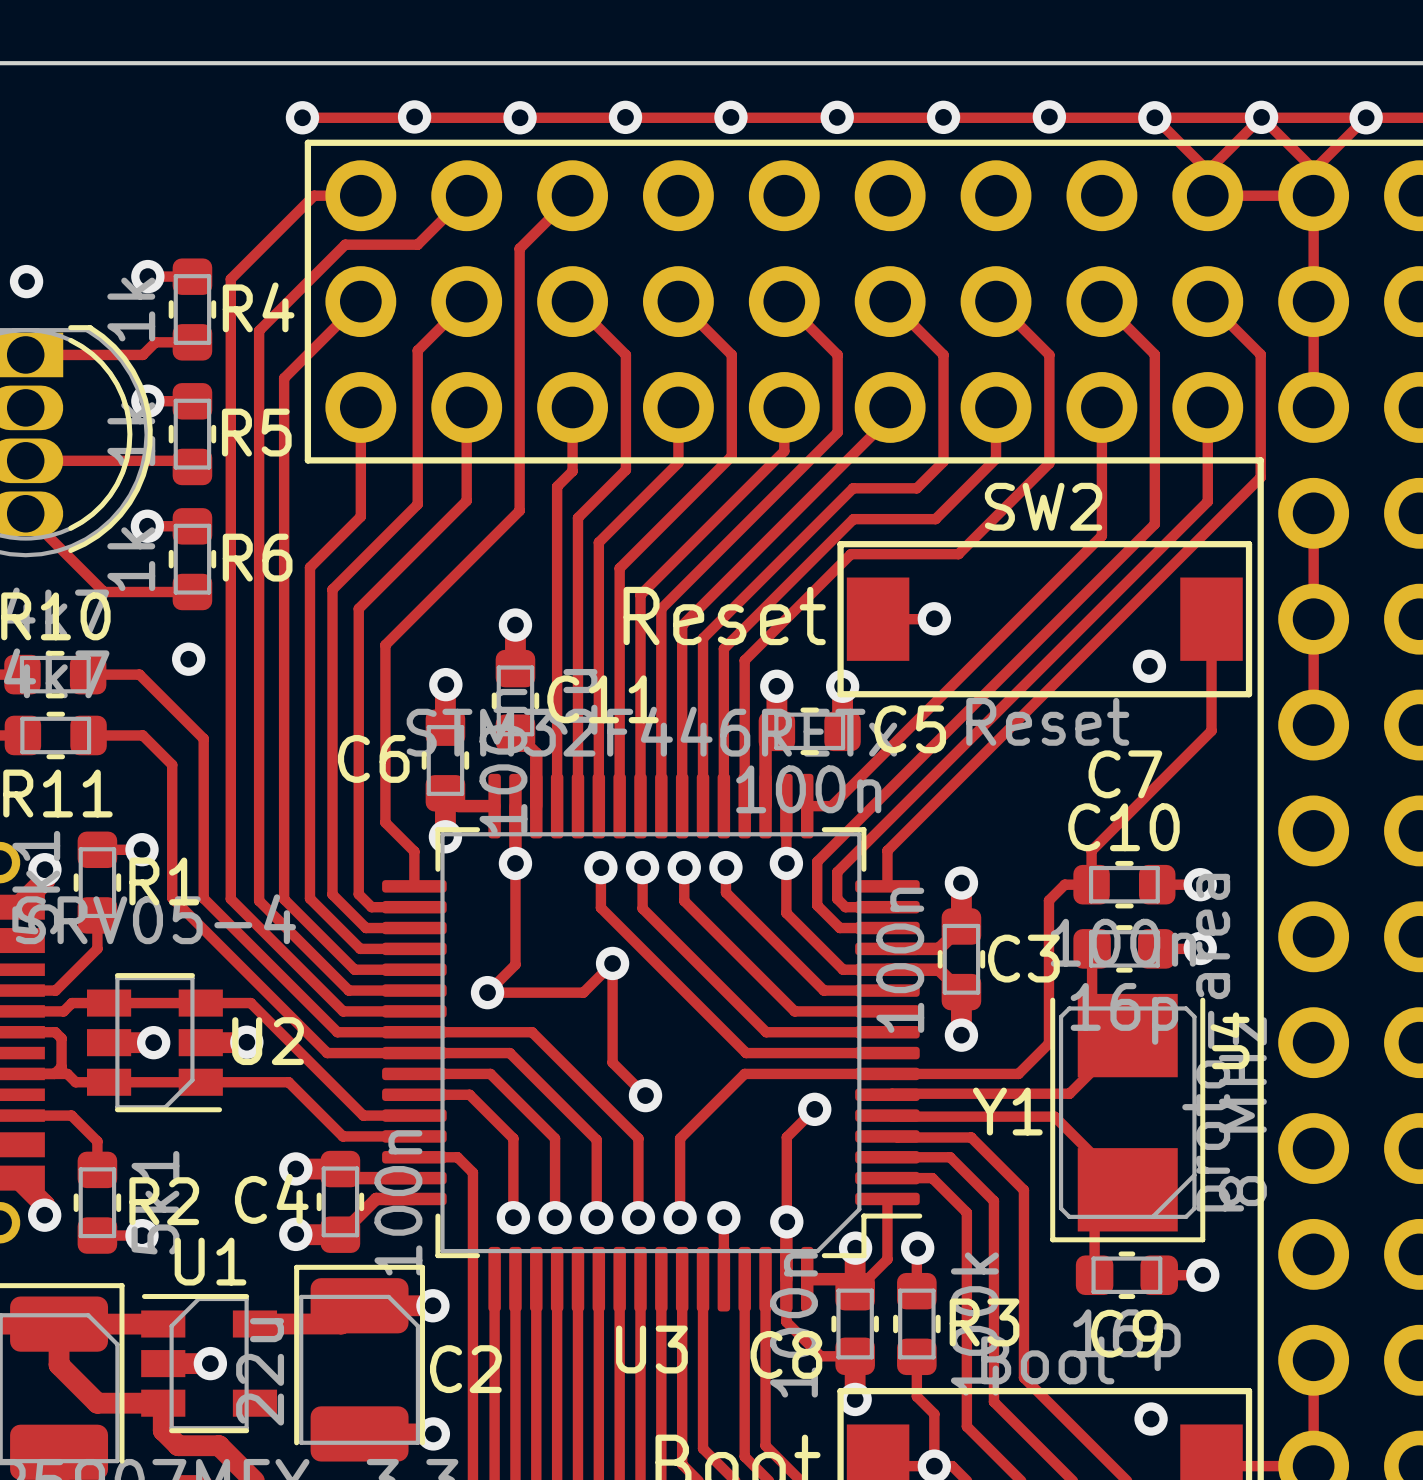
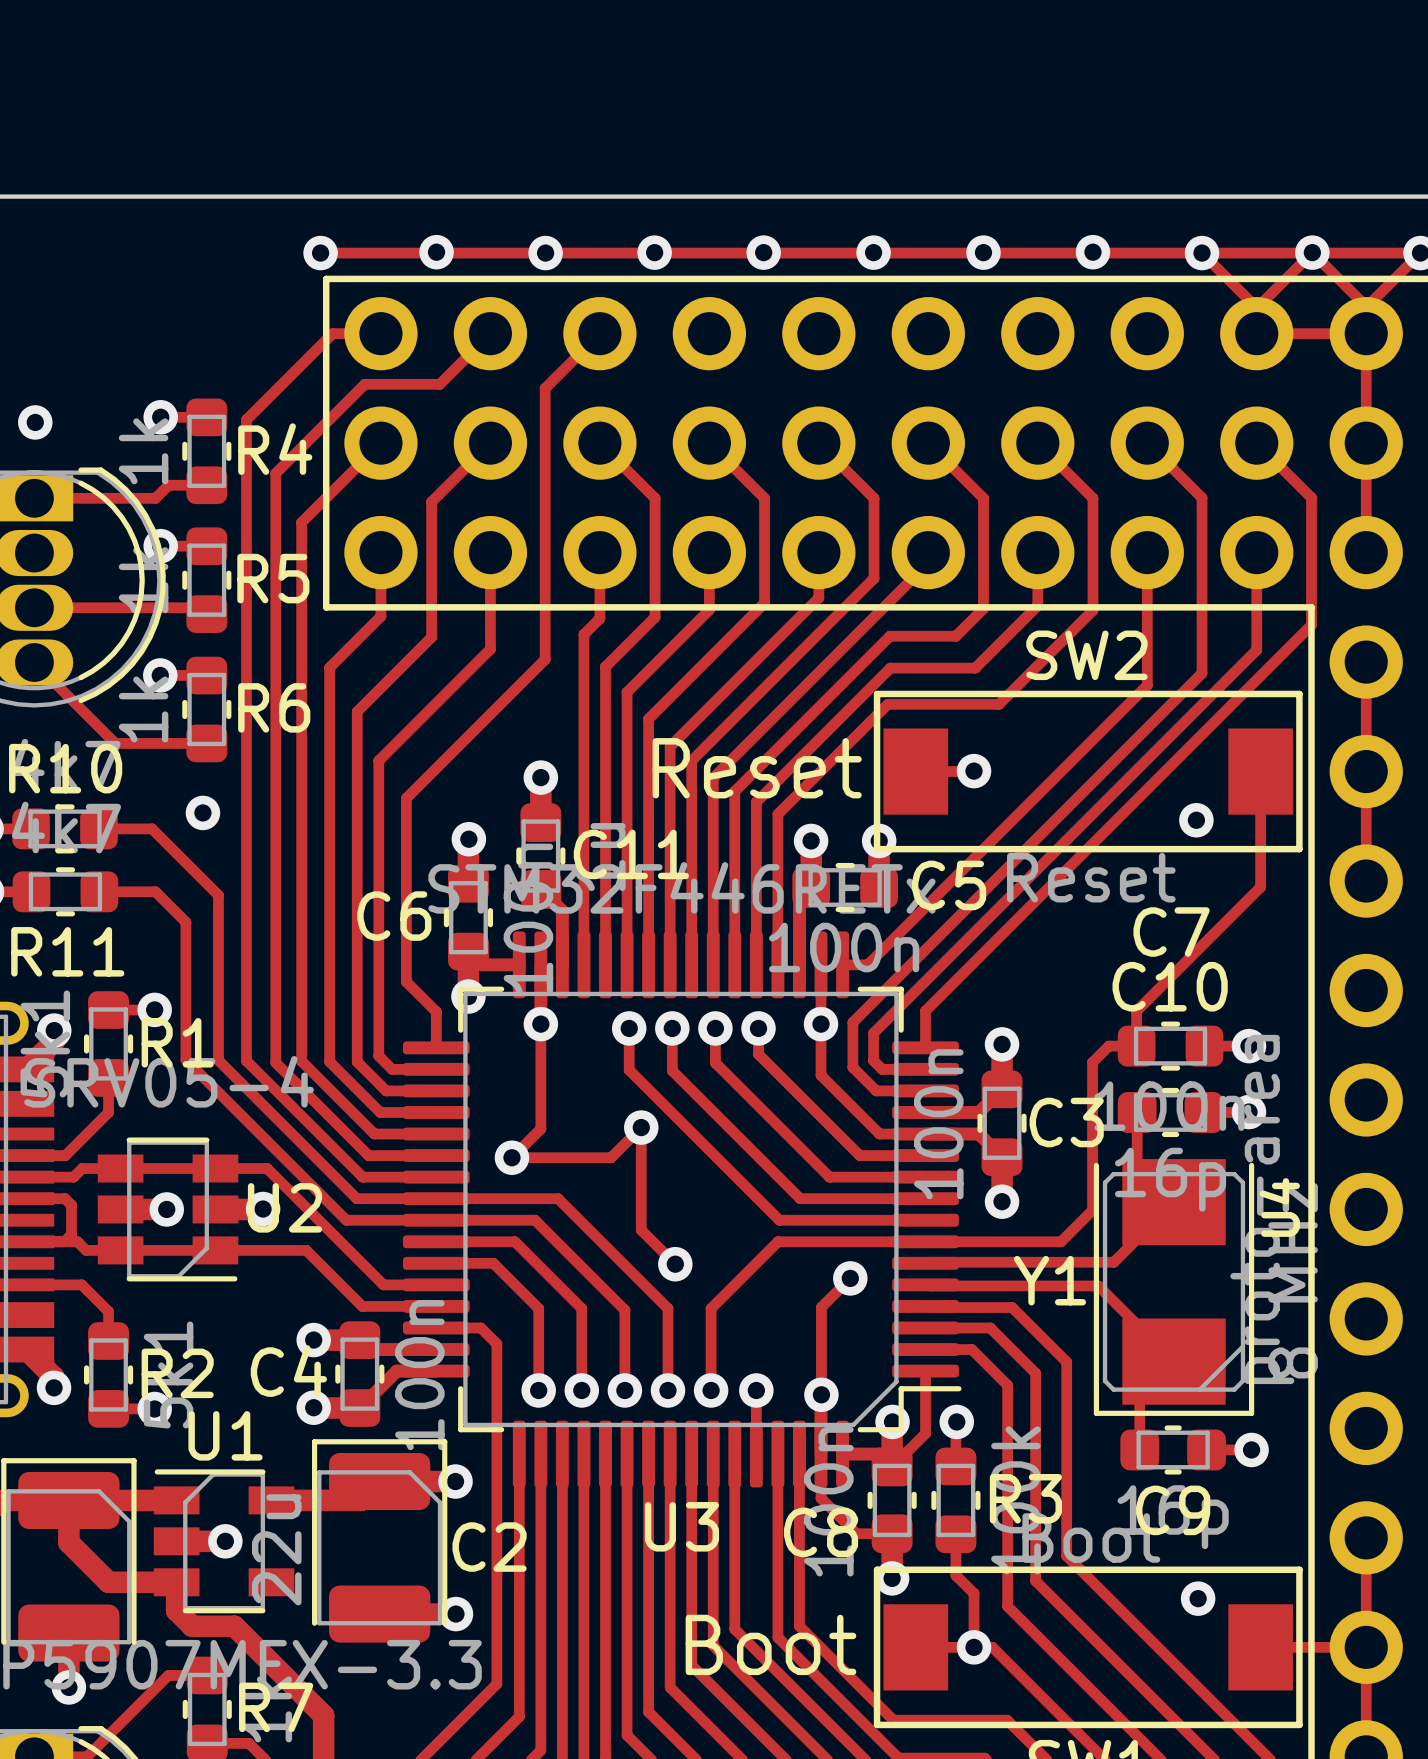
track: (417, 350) (417, 504) (332, 589) (332, 894) (337, 900) -> (439, 493) (431, 501) (431, 637) (357, 711) (357, 1061)
track: (360, 469) (360, 516) (309, 567) (311, 899) -> (380, 616) (329, 667) (329, 1061)

